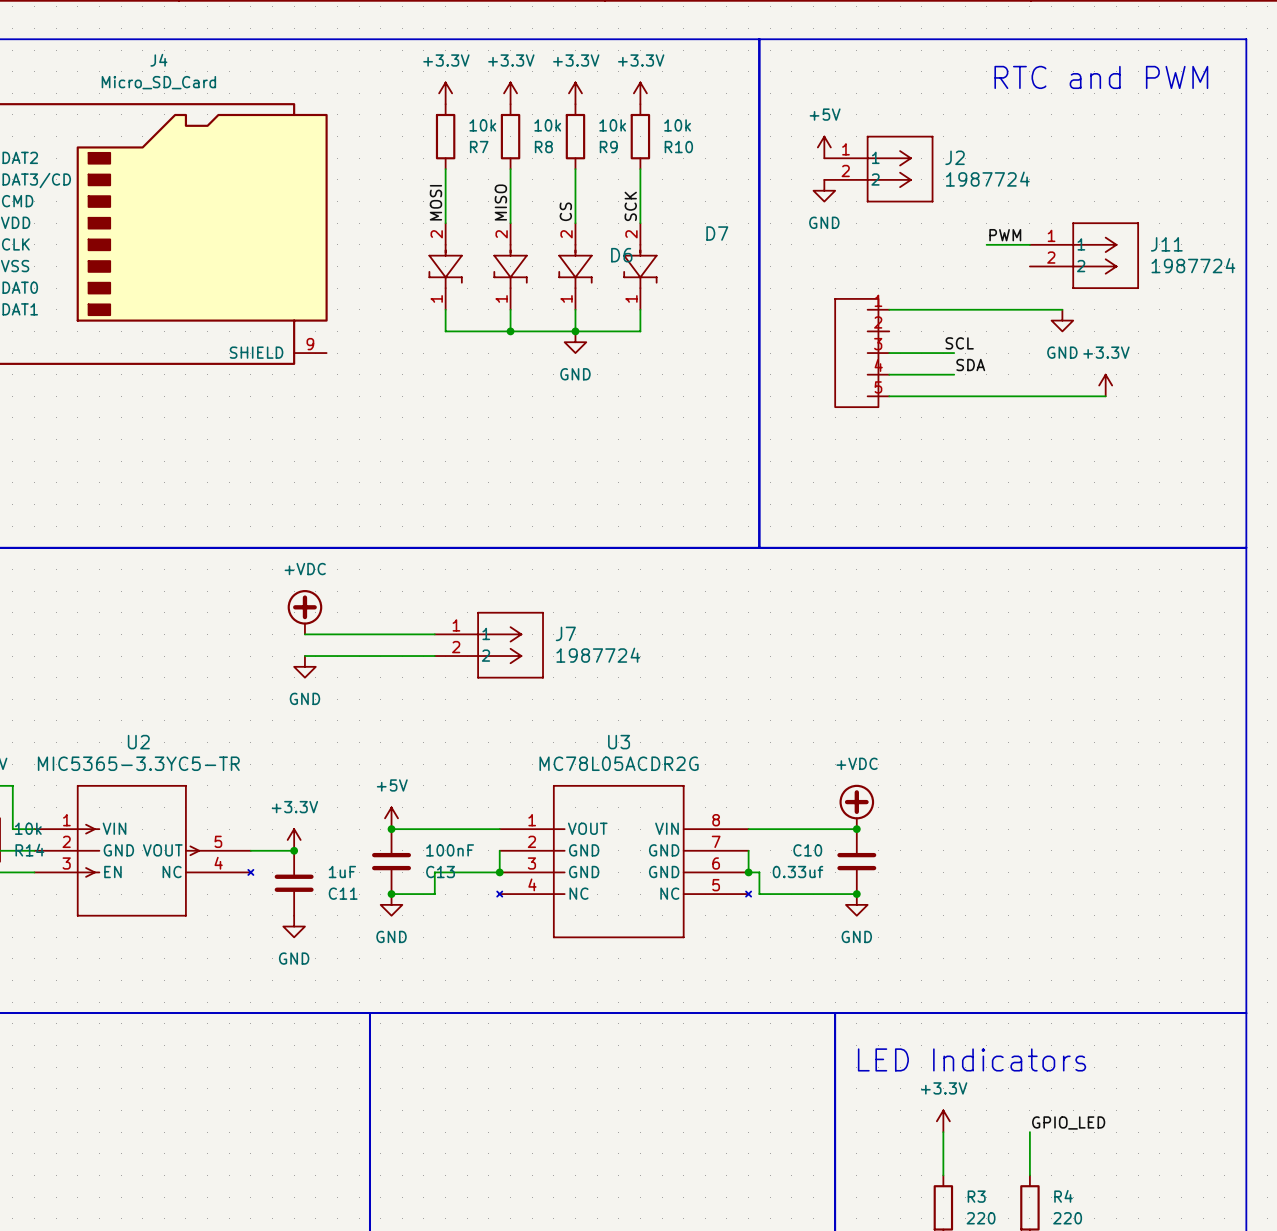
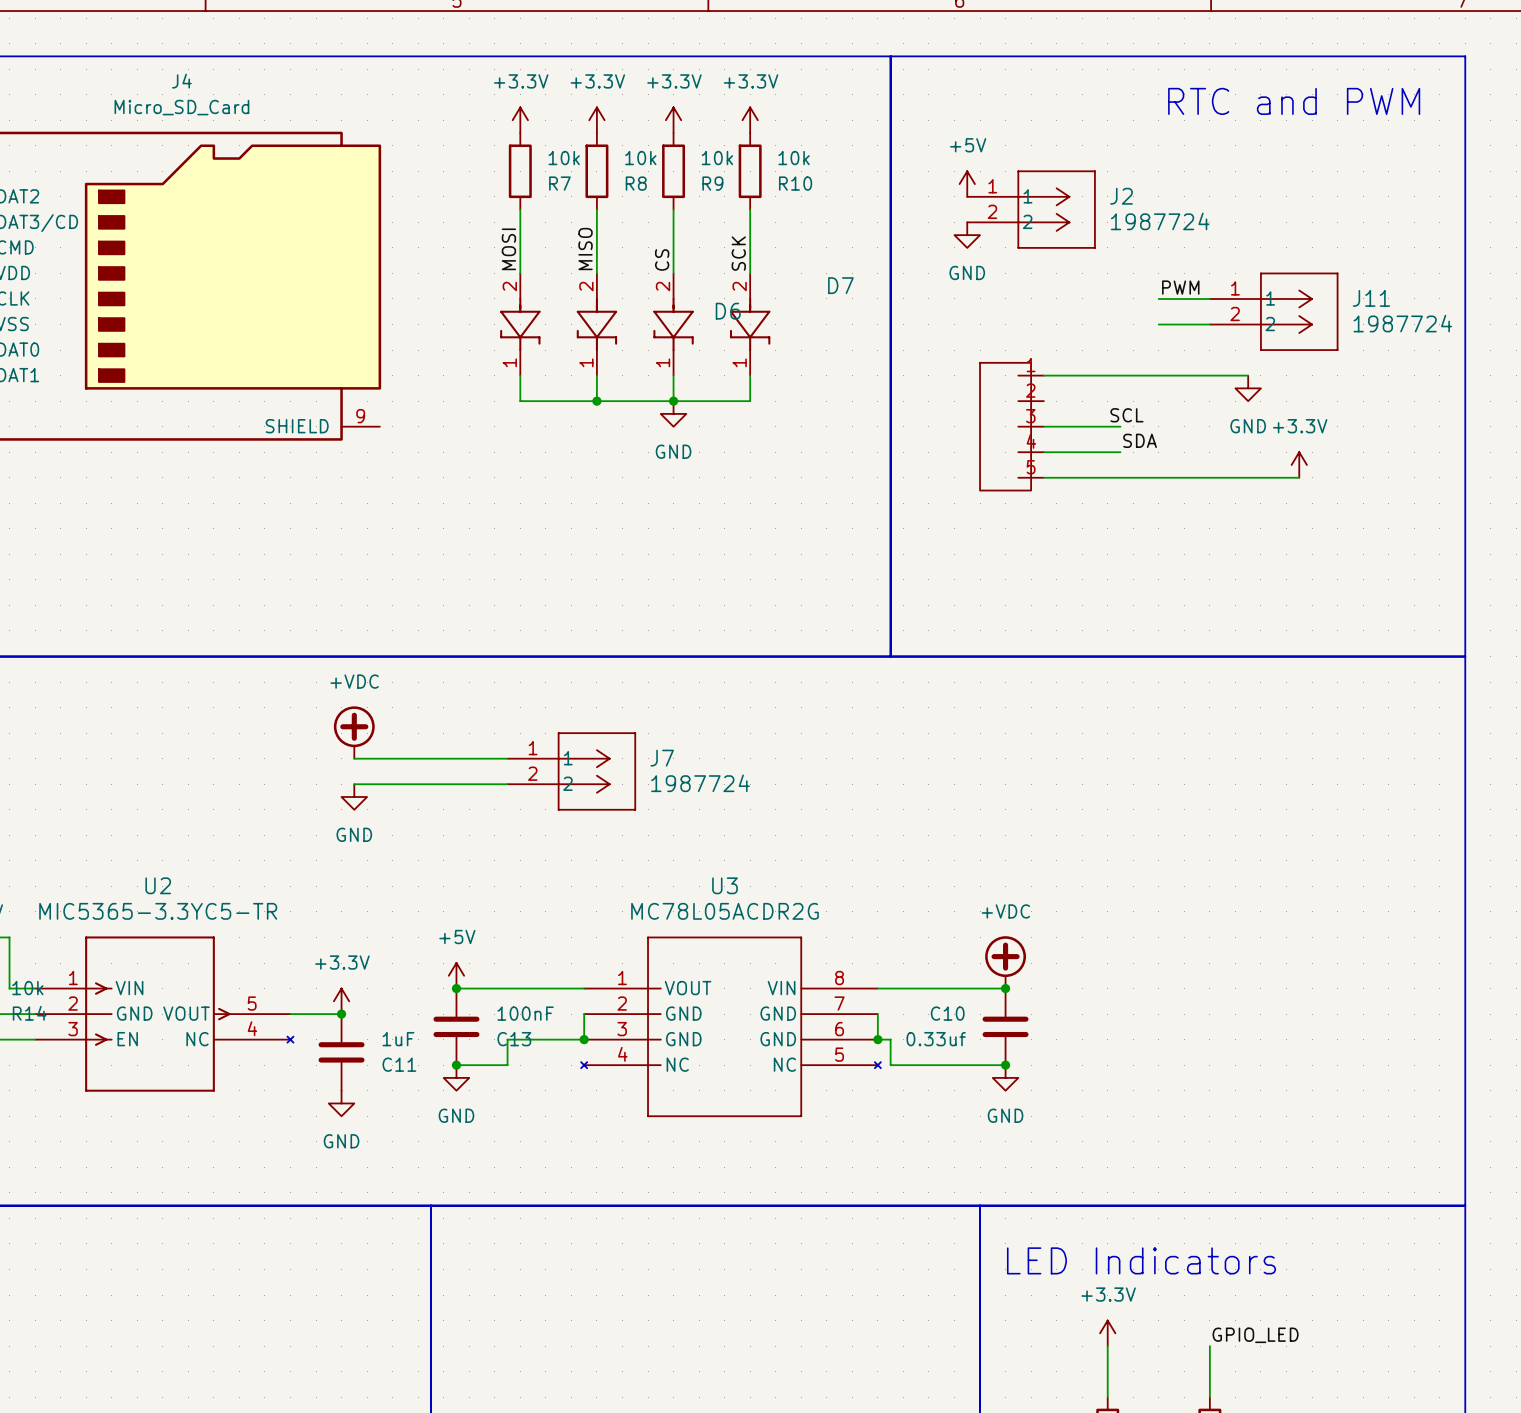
wire: none -> (1158, 324) (1209, 324)

